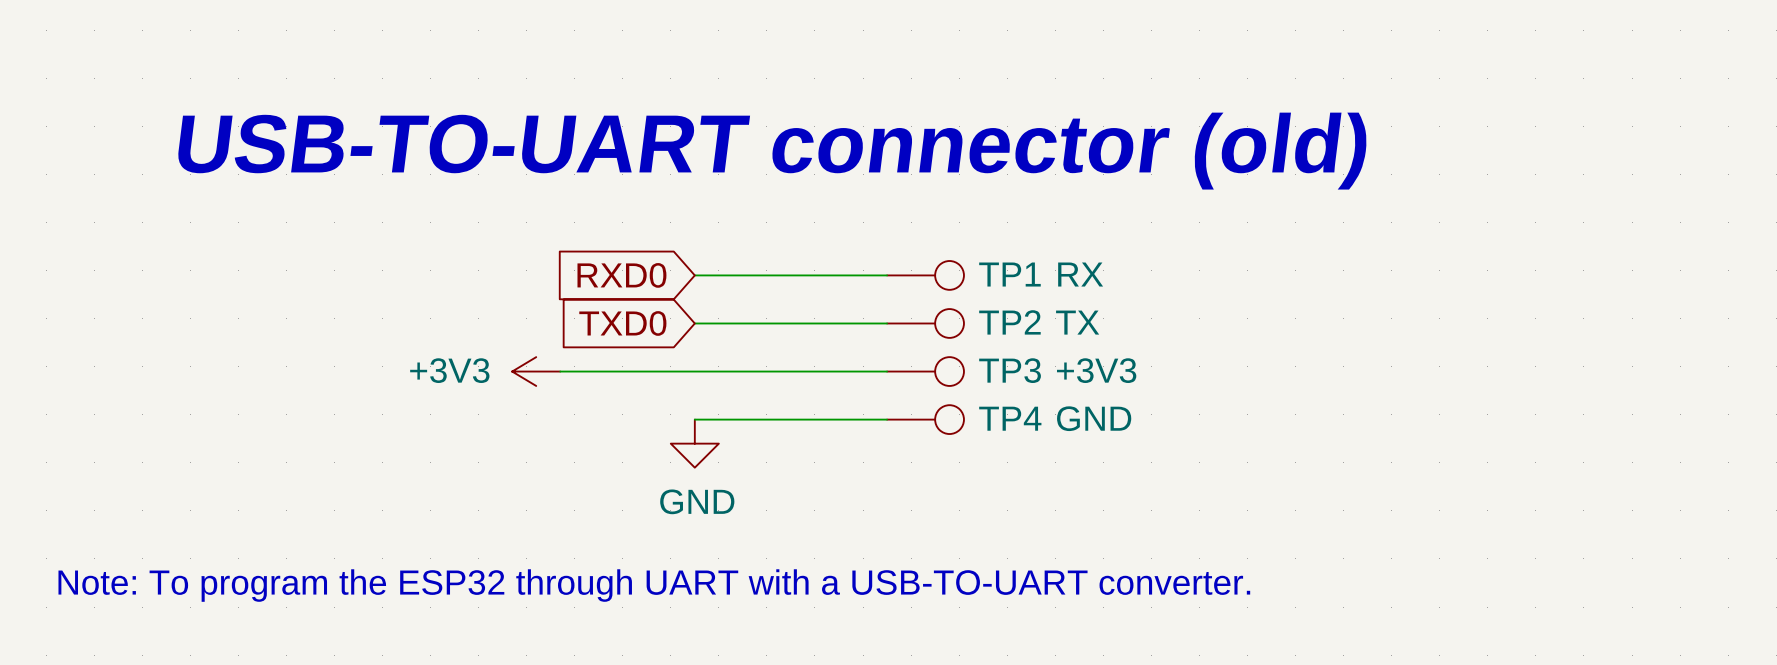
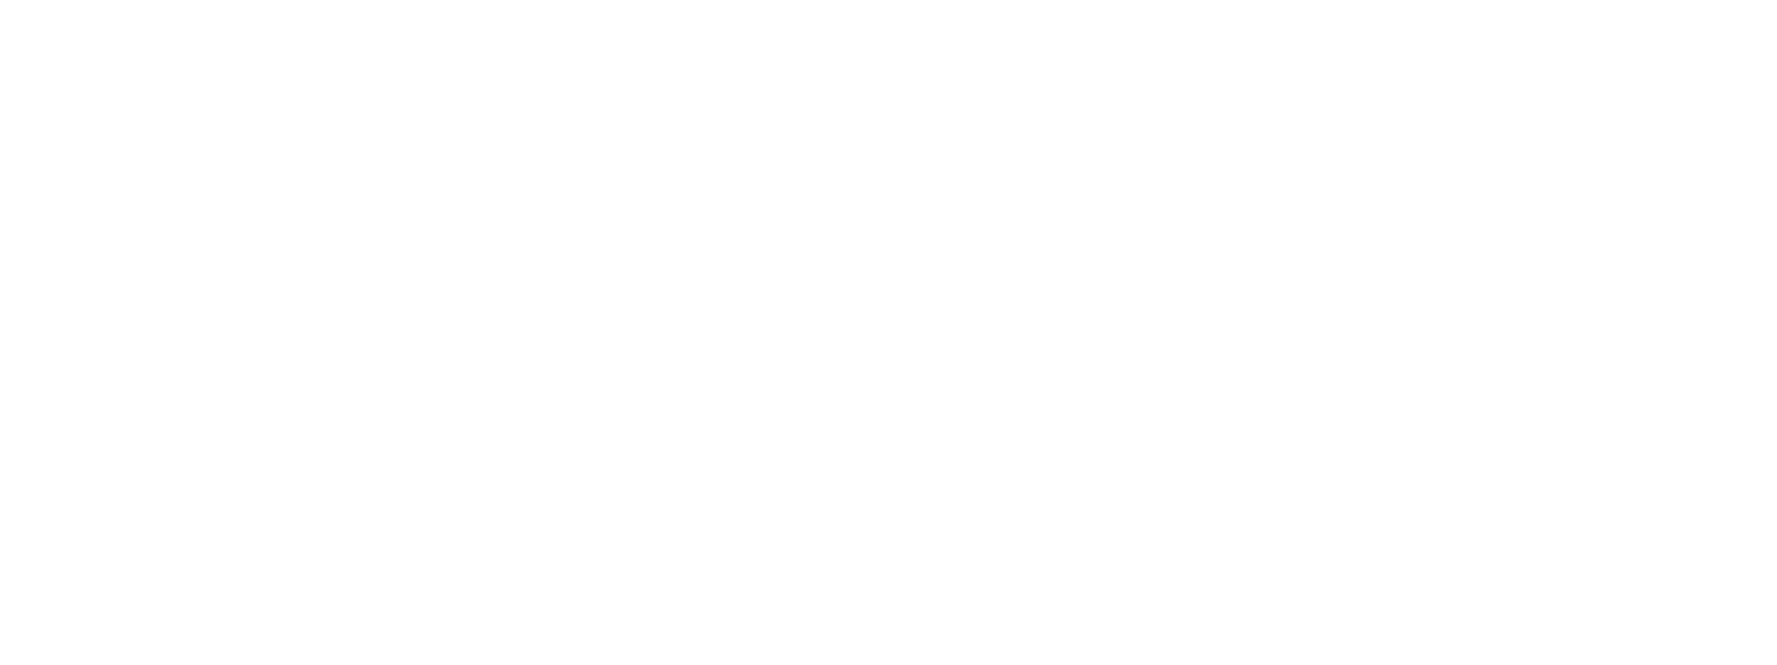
text: USB-TO-UART connector (old) (772, 151) -> none
global label: RXD0 (621, 275) -> none
wire: (694, 275) (887, 275) -> none
TP1: RX (925, 275) -> none
global label: TXD0 (622, 323) -> none
wire: (694, 323) (887, 323) -> none
TP2: TX (925, 323) -> none
power symbol: +3V3 (536, 371) -> none
wire: (560, 371) (887, 371) -> none
TP3: +3V3 (925, 371) -> none
wire: (694, 419) (887, 419) -> none
TP4: GND (925, 419) -> none
power symbol: GND (694, 443) -> none
text: Note: To program the ESP32 through UART with a USB-TO-UART converter. (654, 585) -> none

